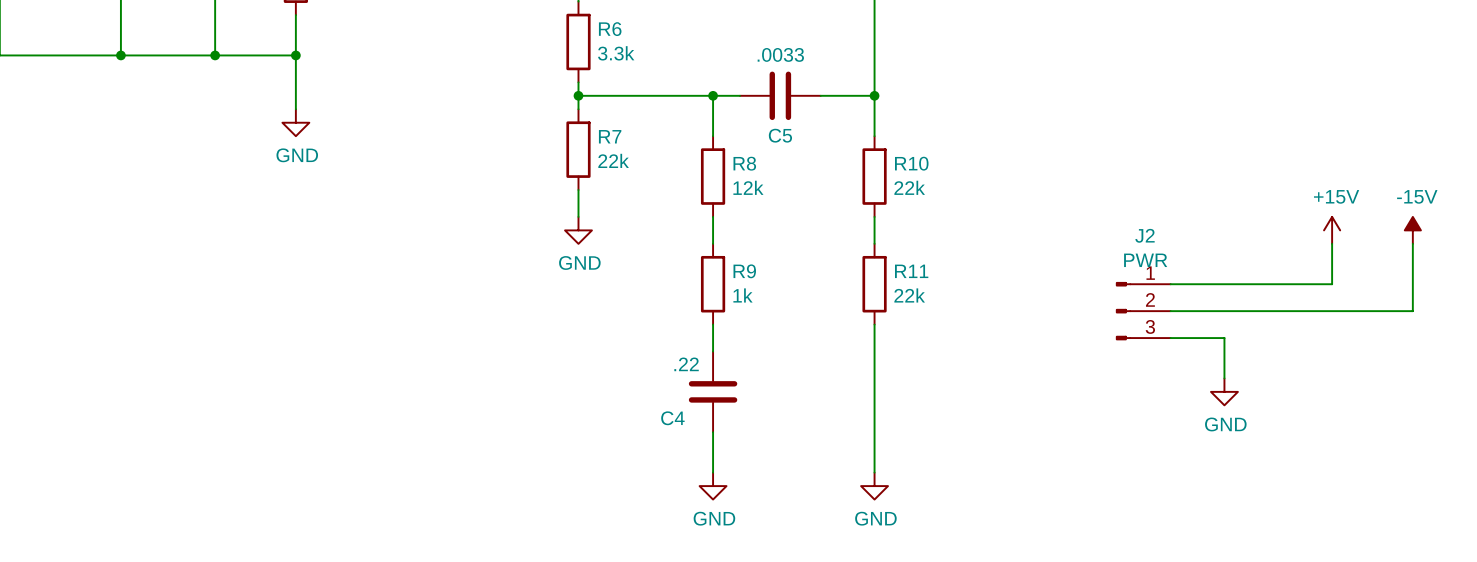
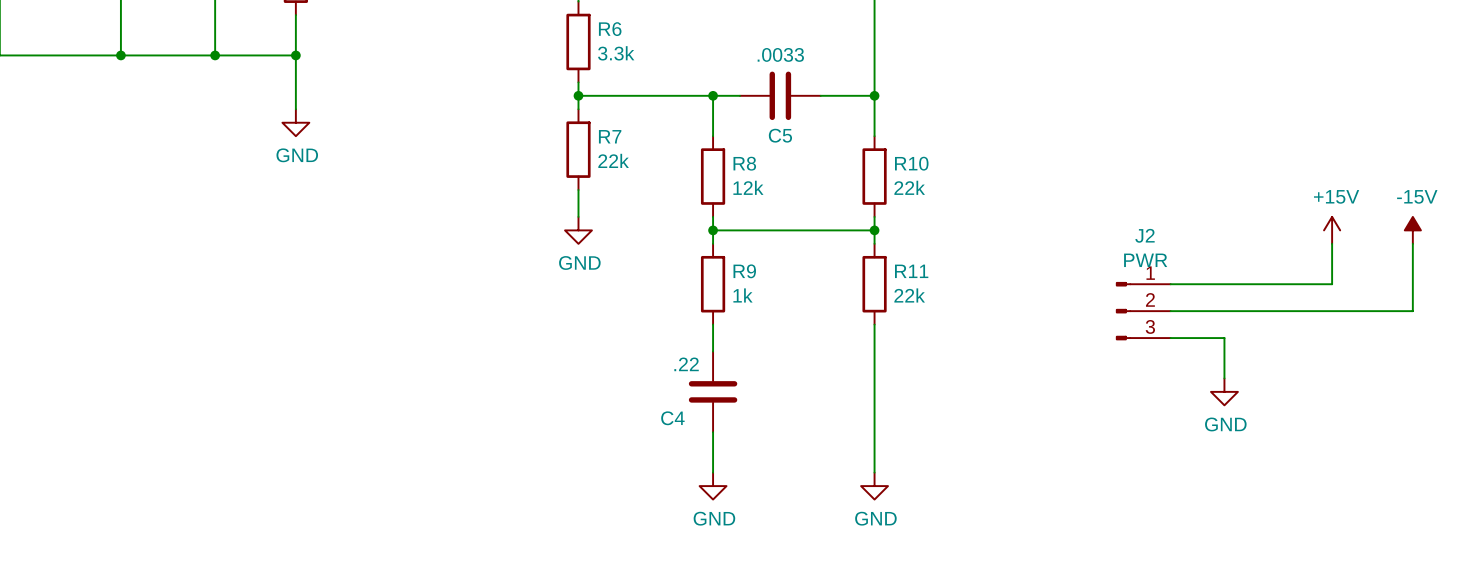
wire: none -> (713, 230) (874, 230)
junction: none -> (713, 230)
junction: none -> (874, 230)

